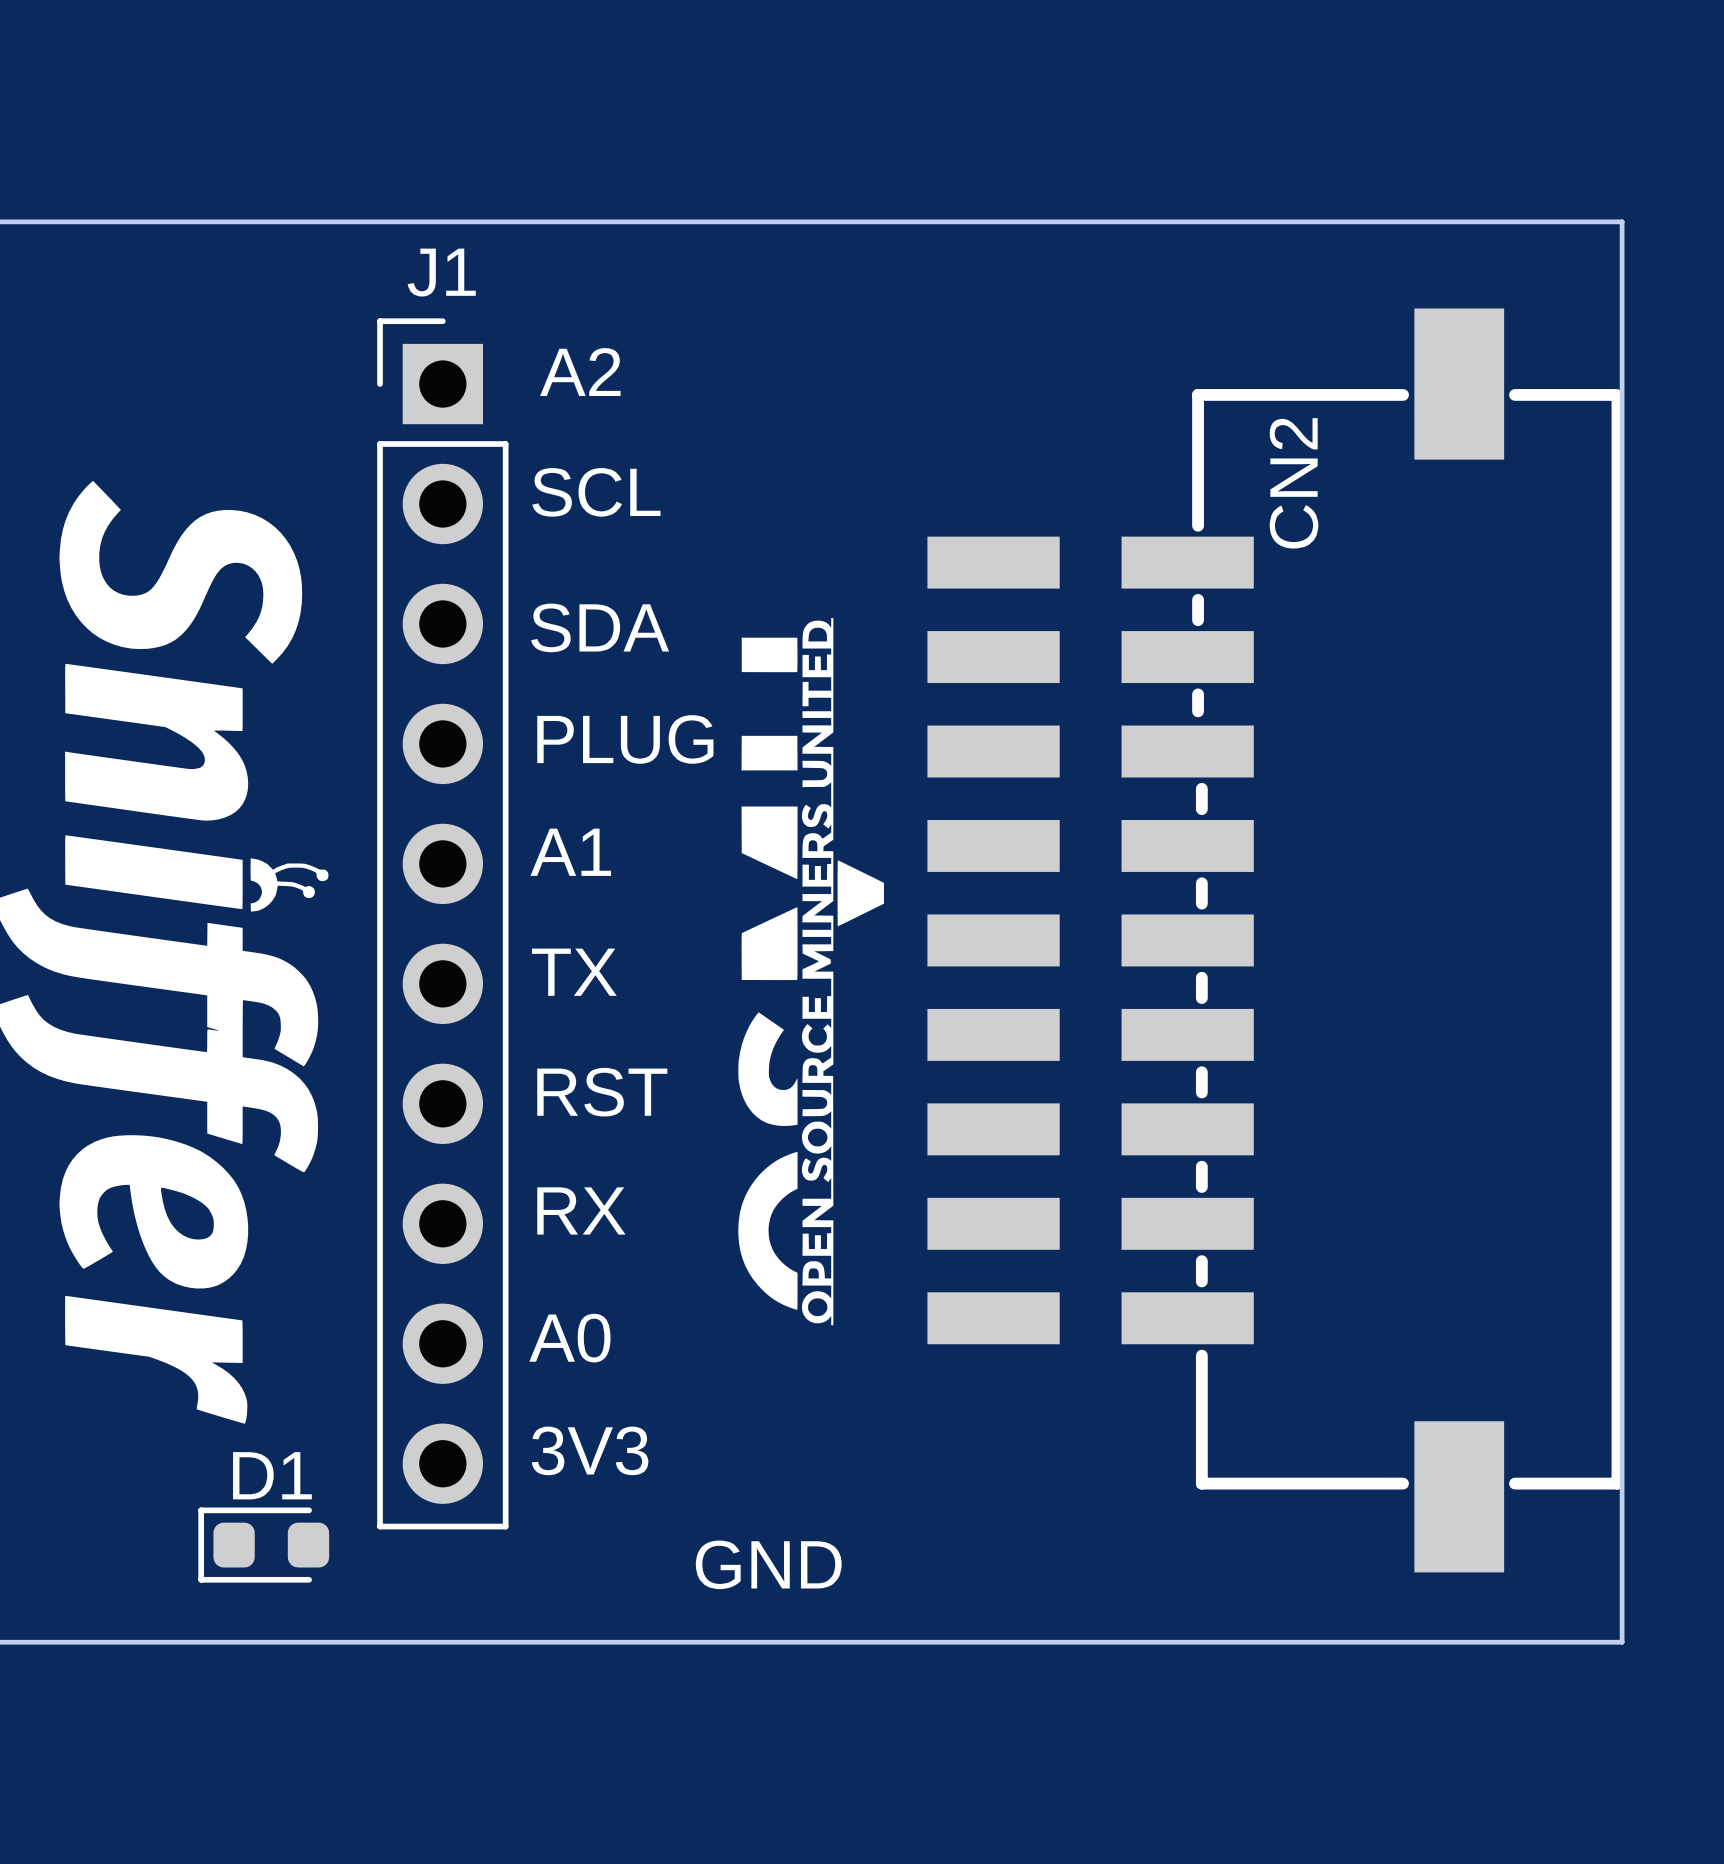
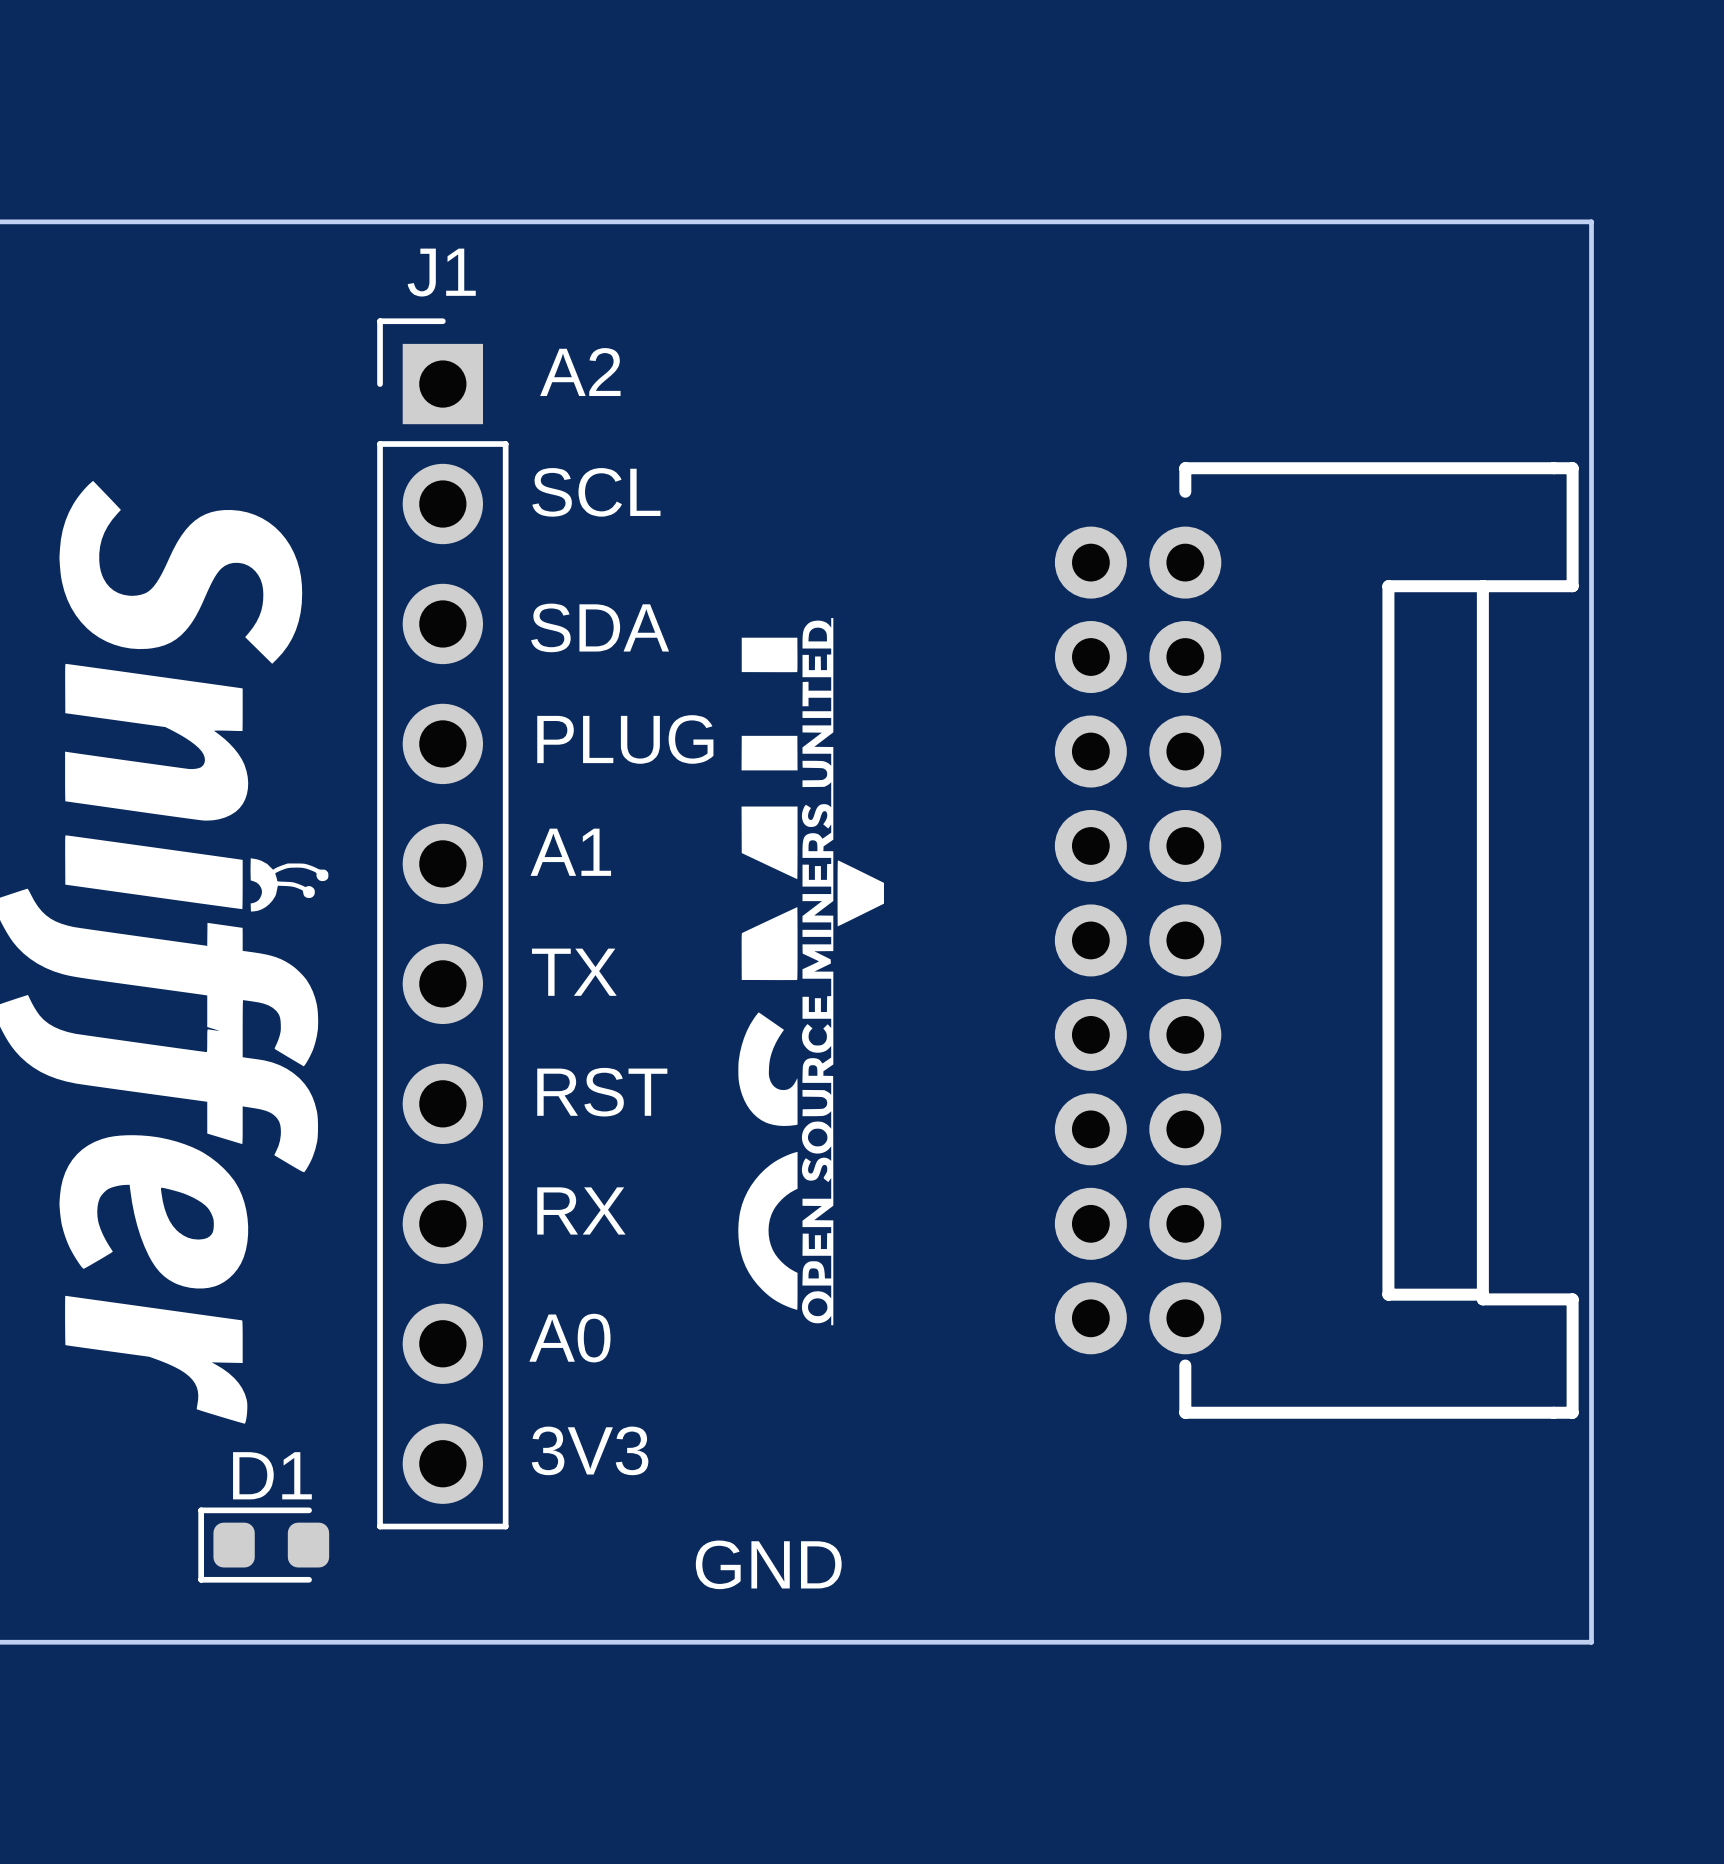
board edge: (1591, 221) (1622, 221) (1622, 1642) (1591, 1642) -> (1591, 221) (1591, 1642)
CN2: (1275, 940) -> none
part: none -> (1316, 940)

